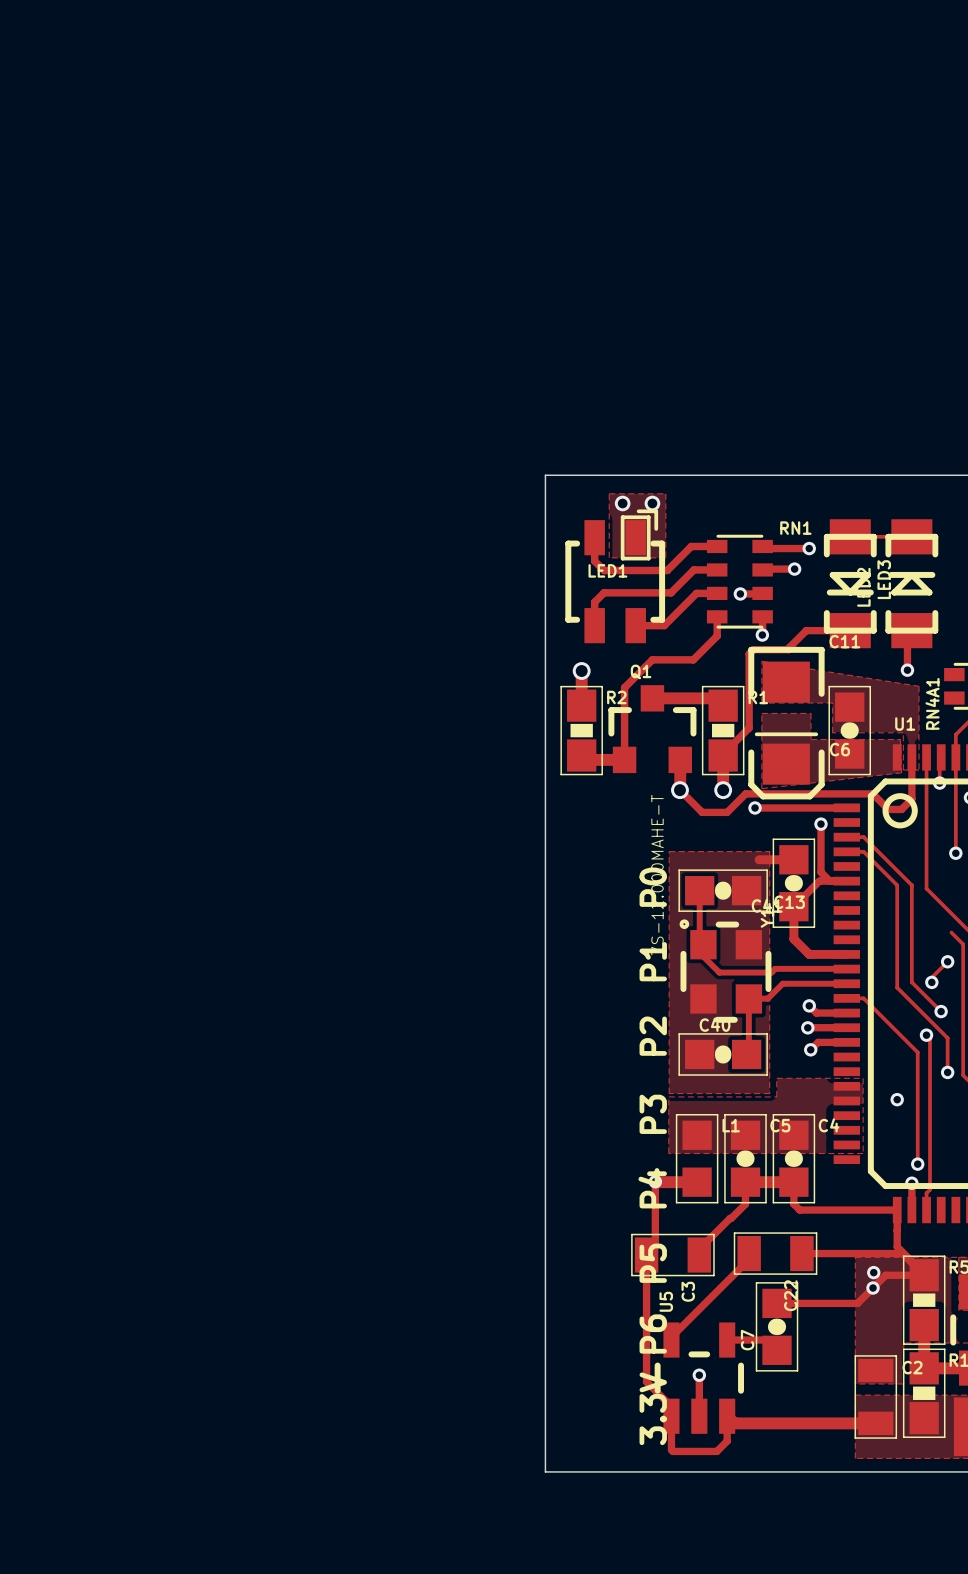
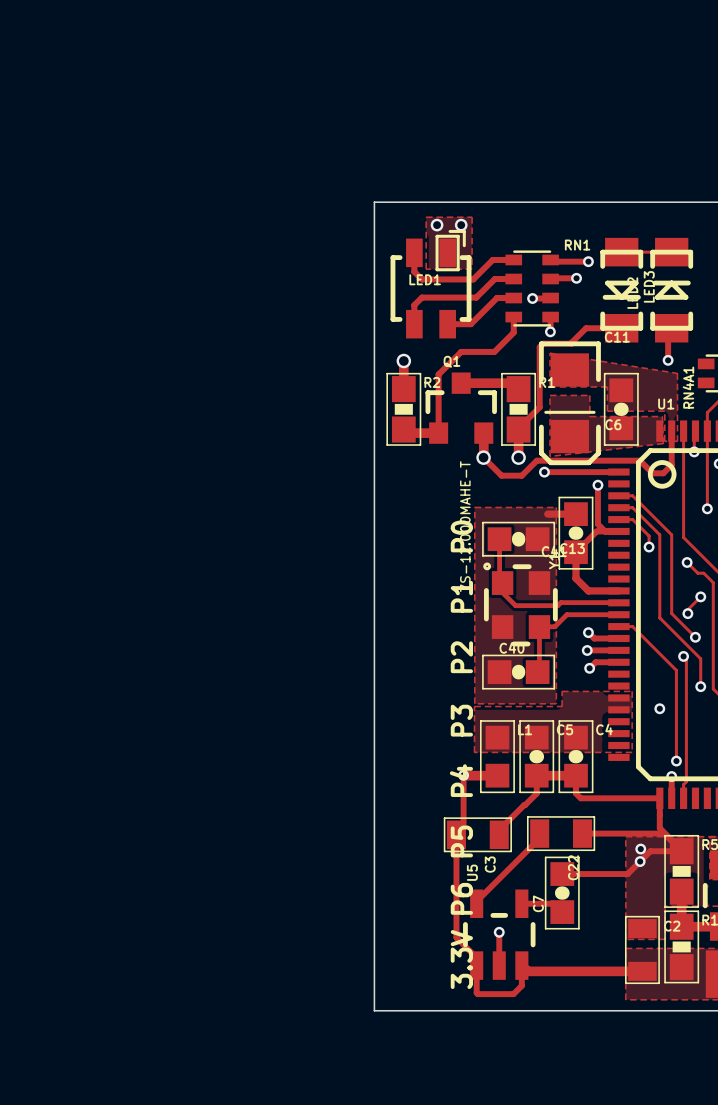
track: none -> (618, 519) (632, 519) (649, 536) (649, 547)
via: none -> (649, 547)
track: none -> (687, 562) (697, 573) (703, 573)
via: none -> (687, 562)

